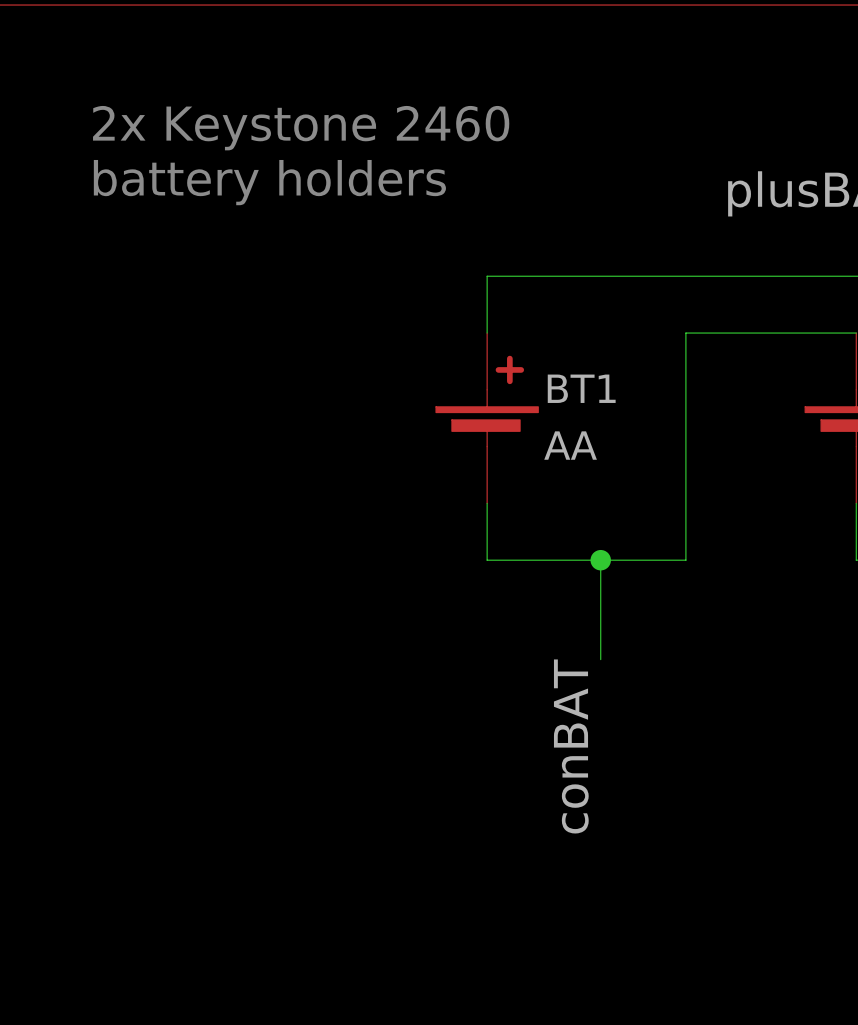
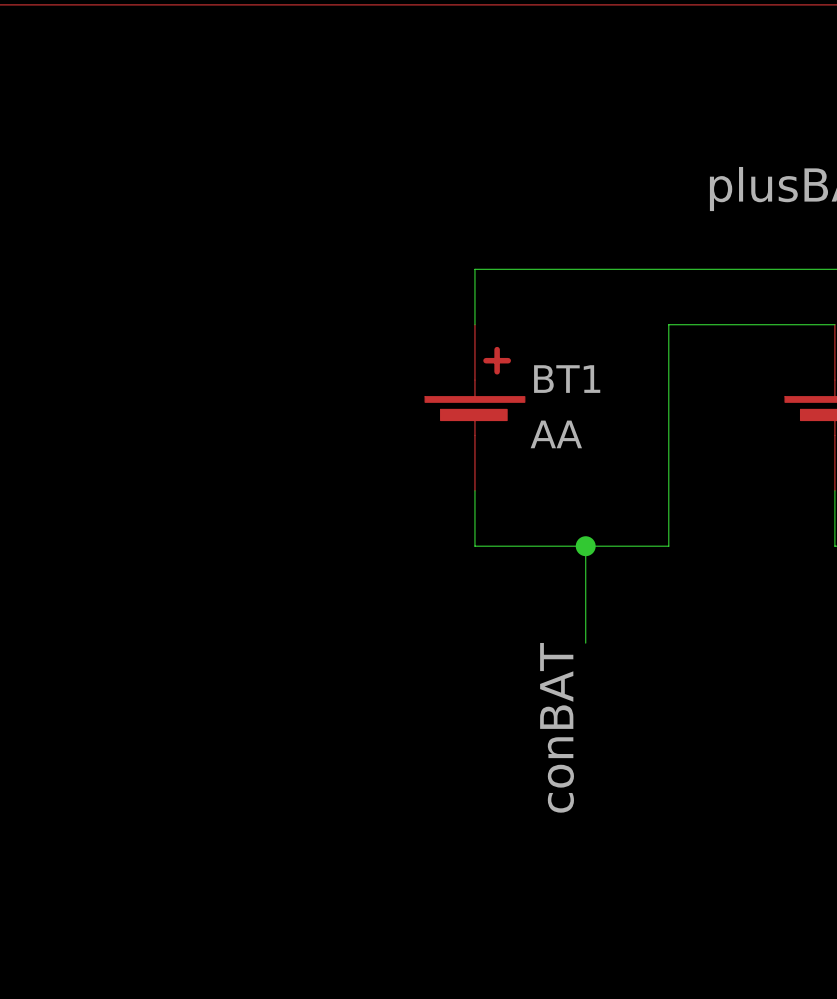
text: 2x Keystone 2460 (301, 128) -> none
text: battery holders (269, 182) -> none

